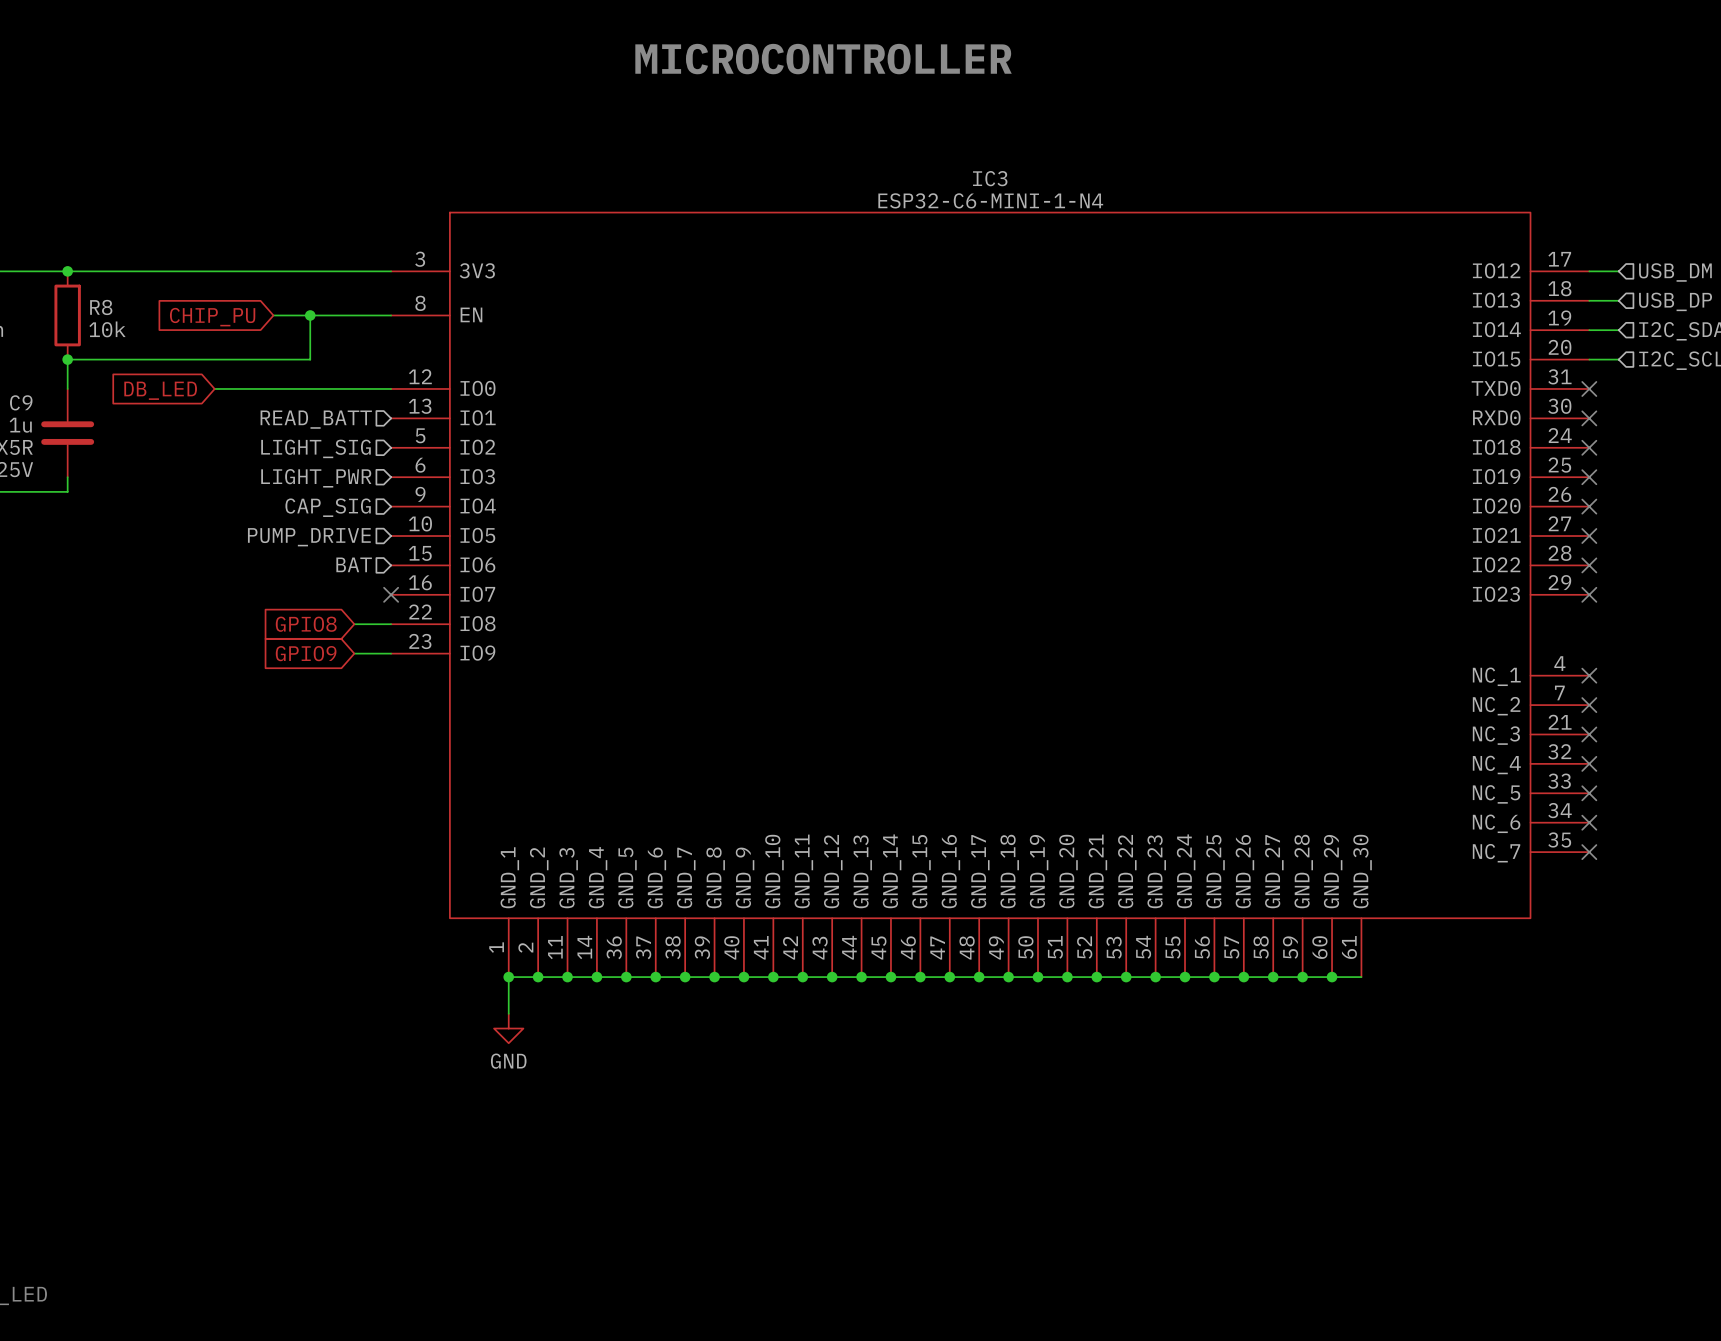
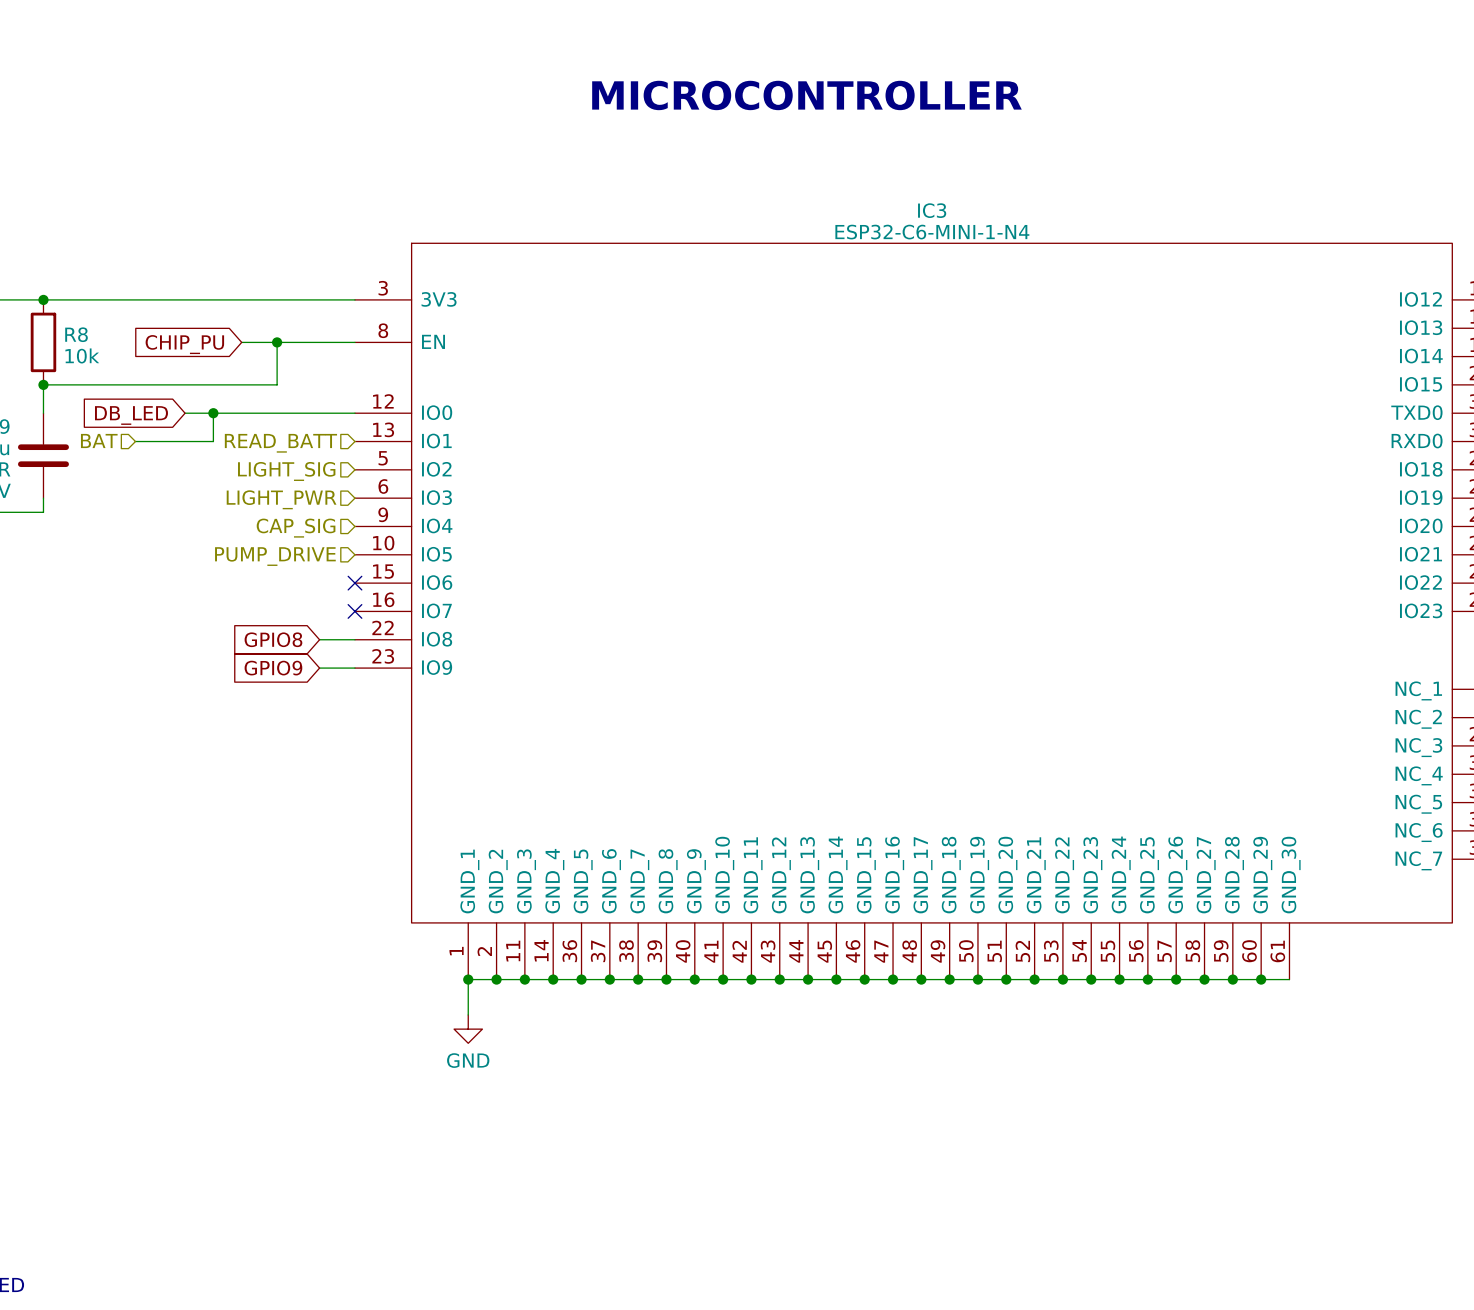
wire: none -> (213, 413) (213, 441) (135, 441)
junction: none -> (213, 413)
hierarchical label position: BAT (354, 564) -> BAT (99, 440)
no-connect mark: none -> (354, 583)

